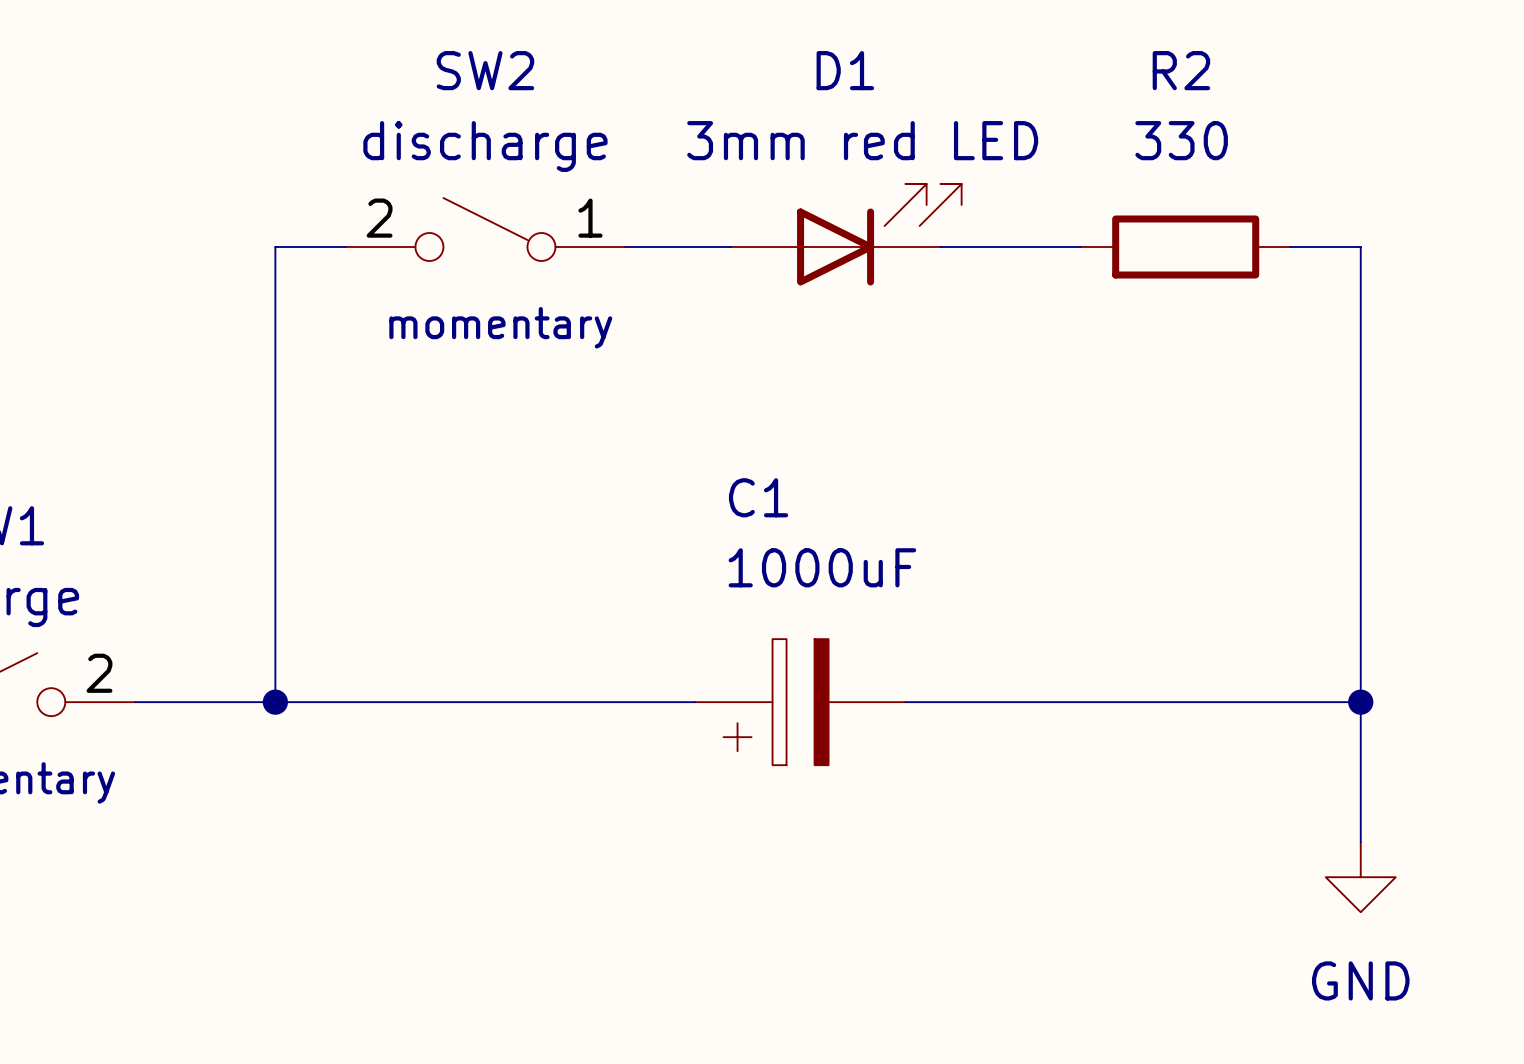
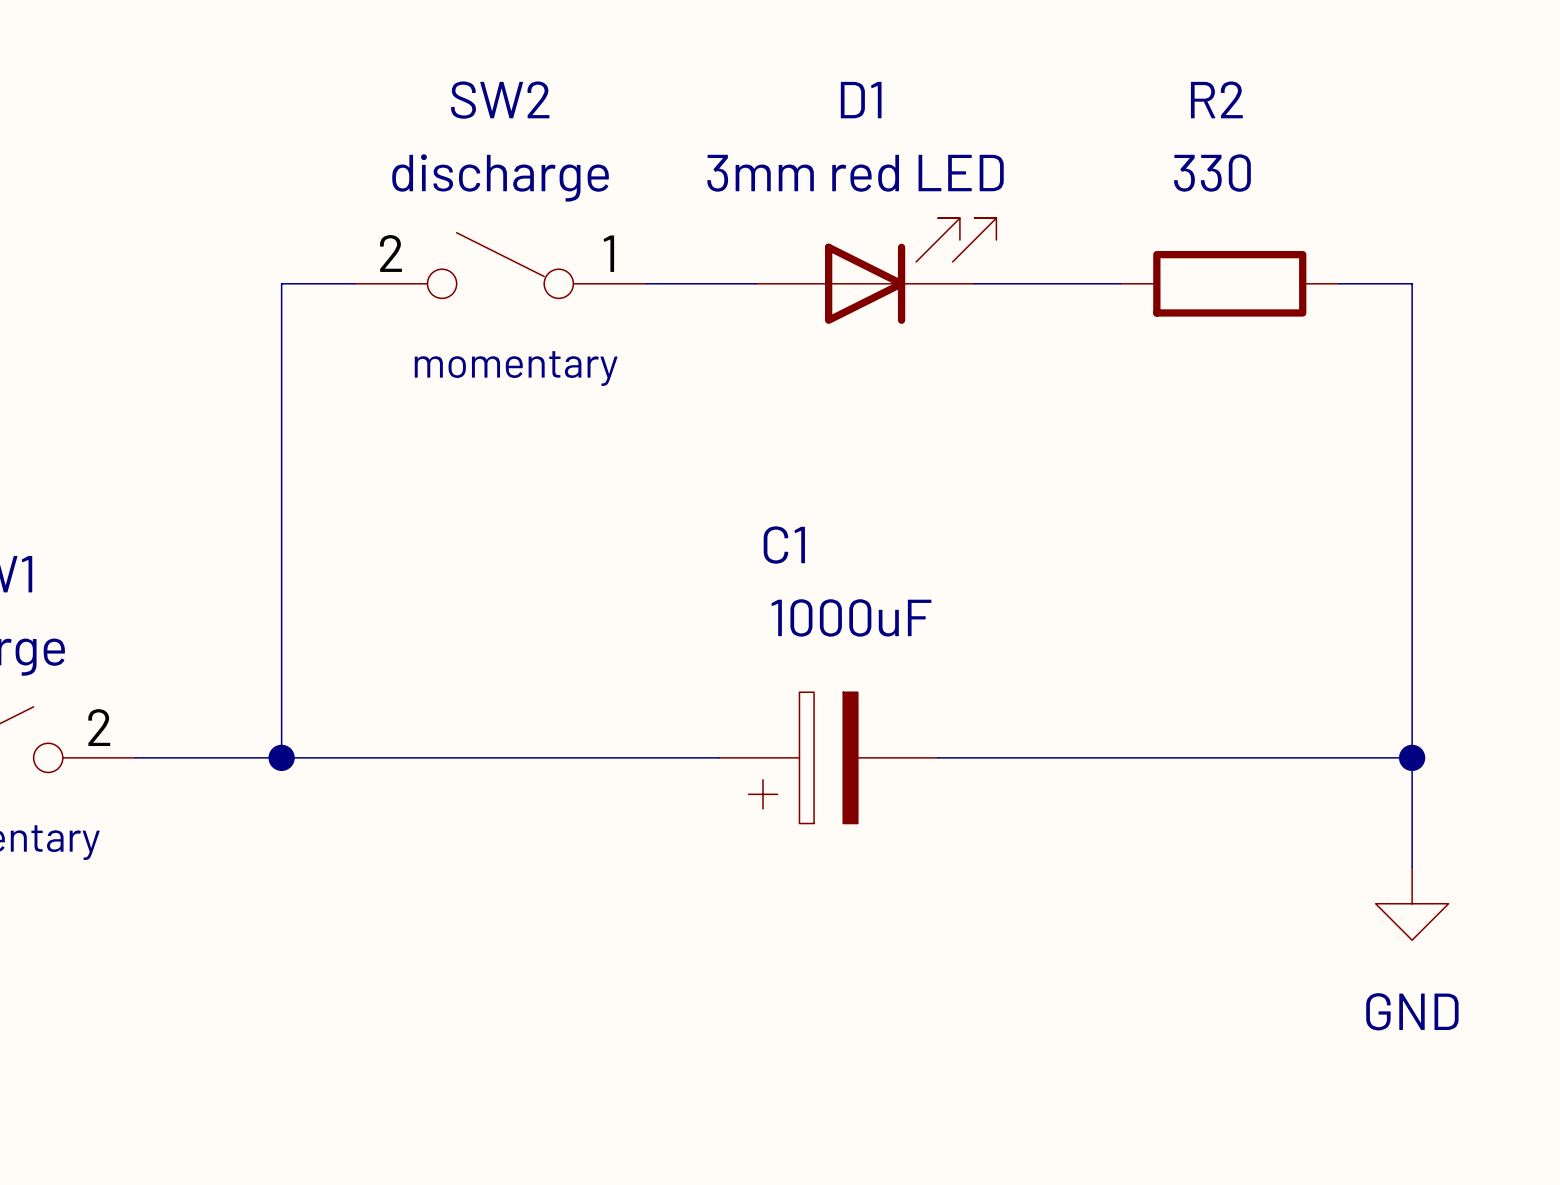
power symbol position: GND (1360, 877) -> GND (1412, 903)

